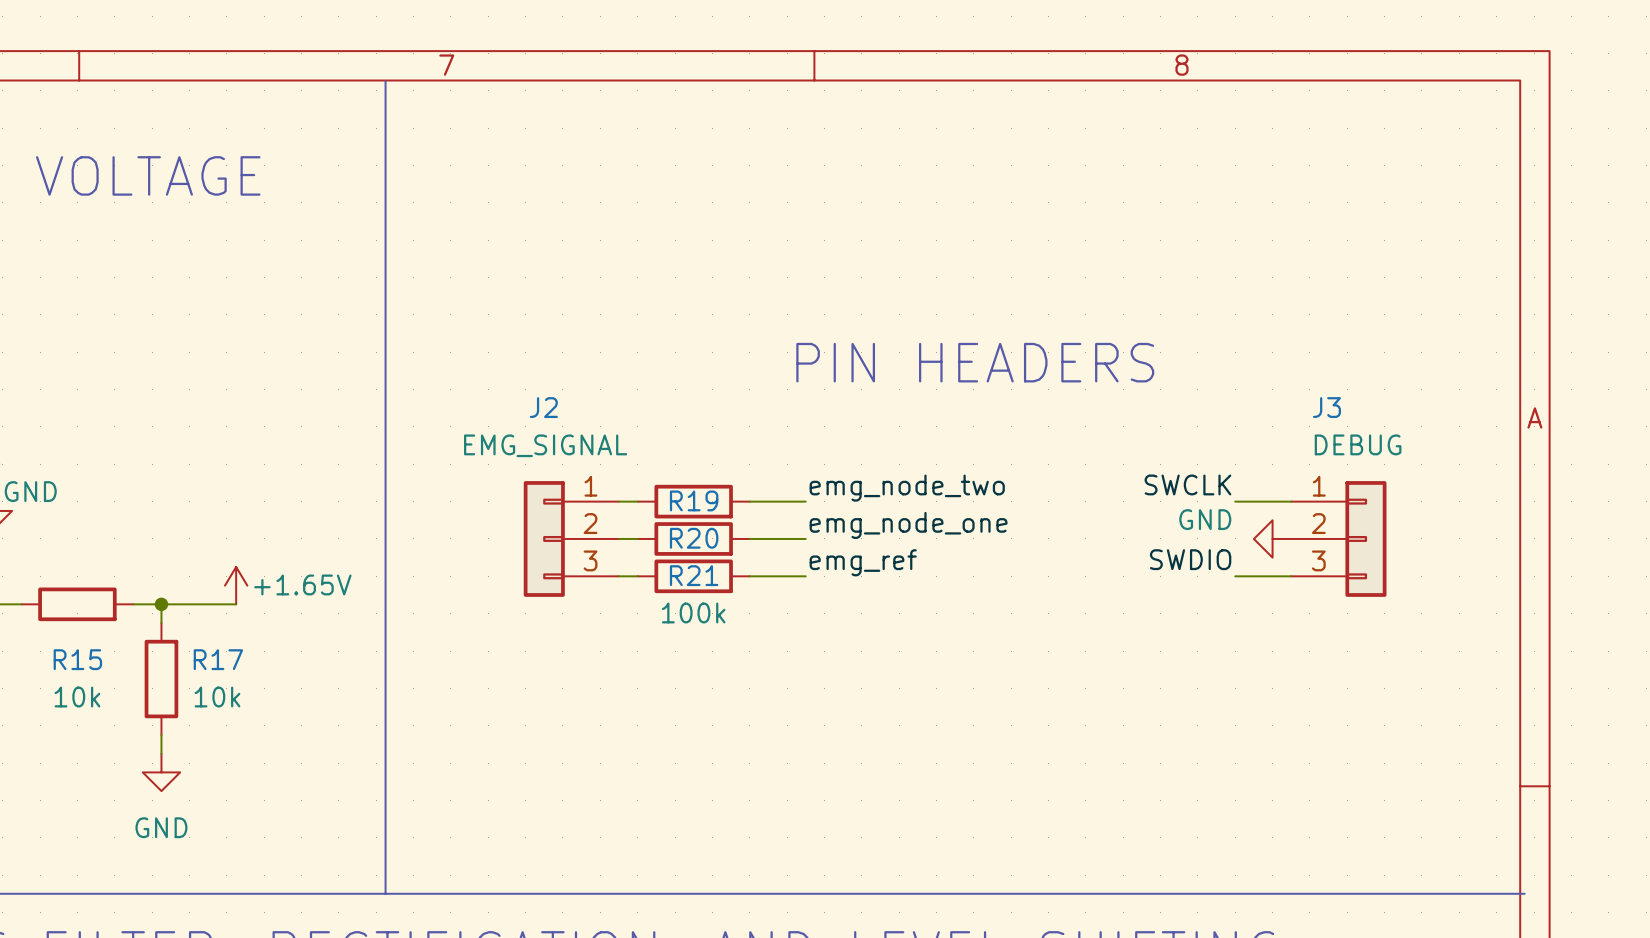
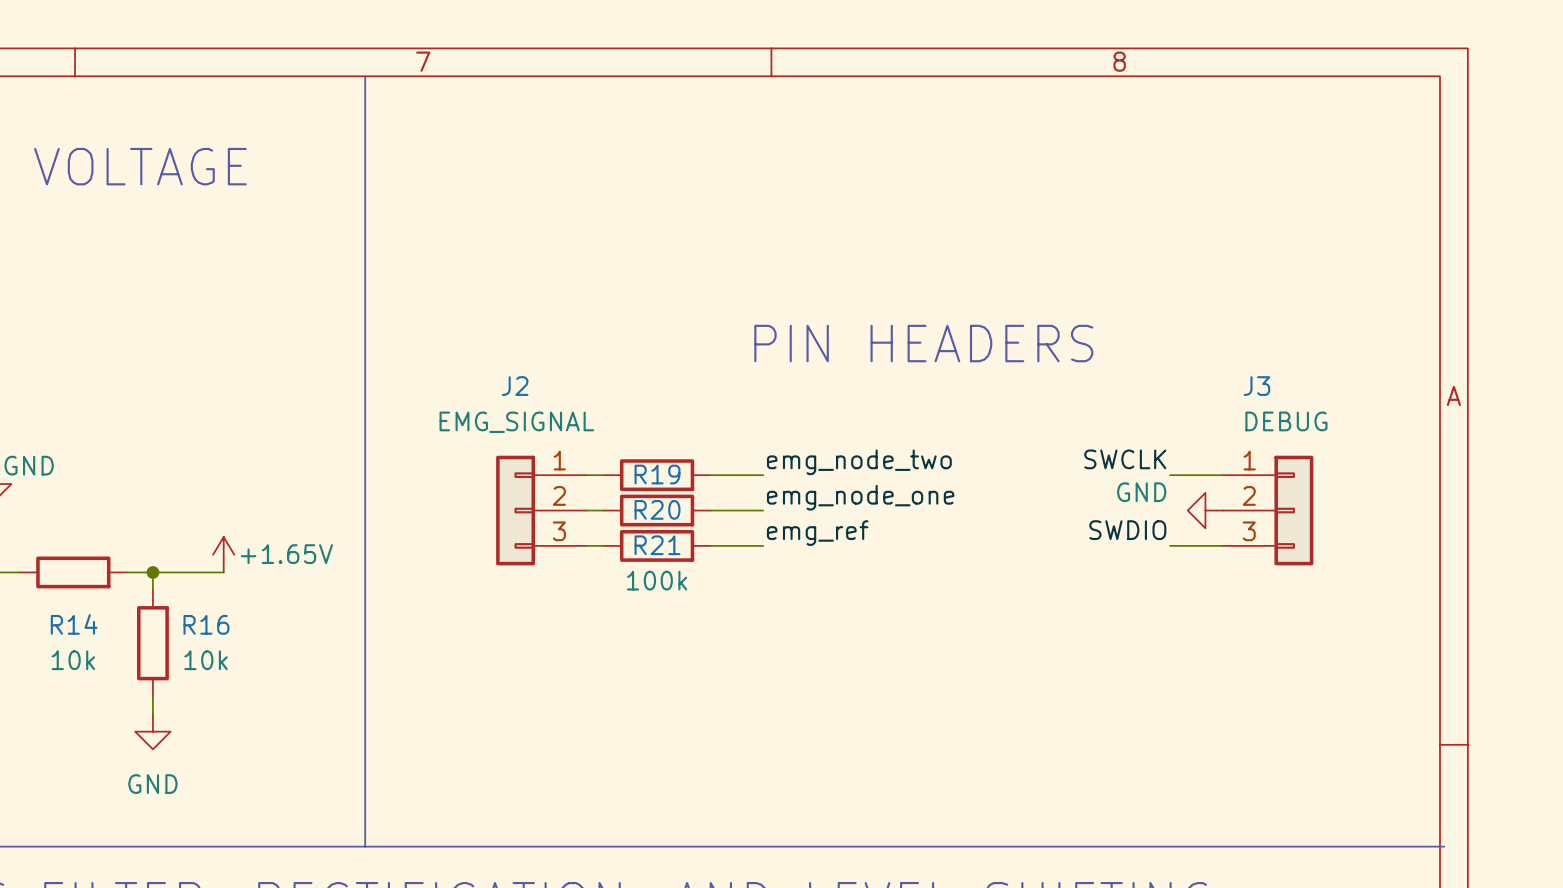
R15 name: R15 (77, 659) -> R14 (74, 624)
R17 name: R17 (218, 659) -> R16 (206, 624)

